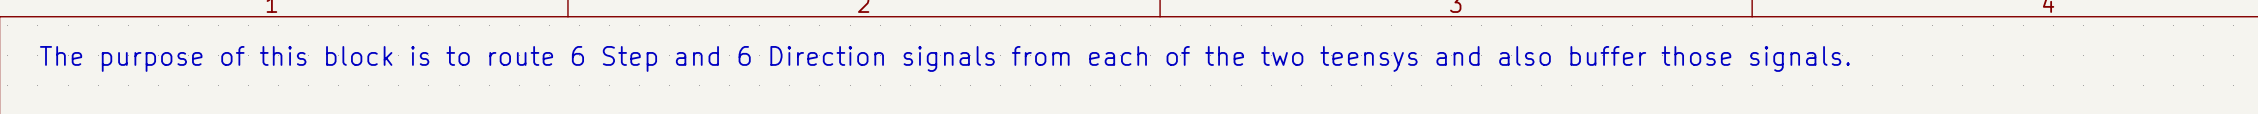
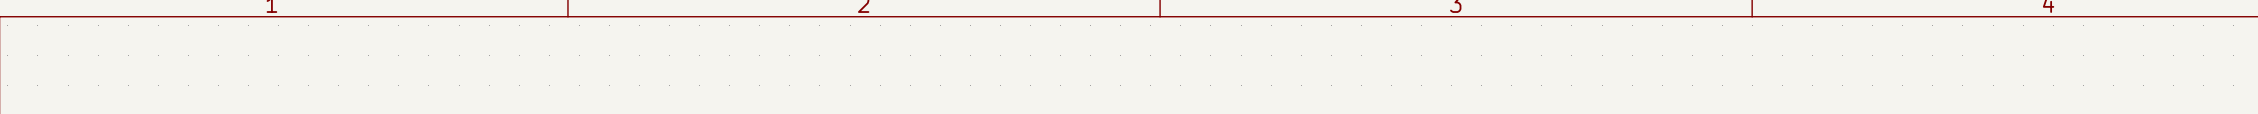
text: The purpose of this block is to route 6 Step and 6 Direction signals from each of the two teensys and also buffer those signals. (944, 58) -> none

